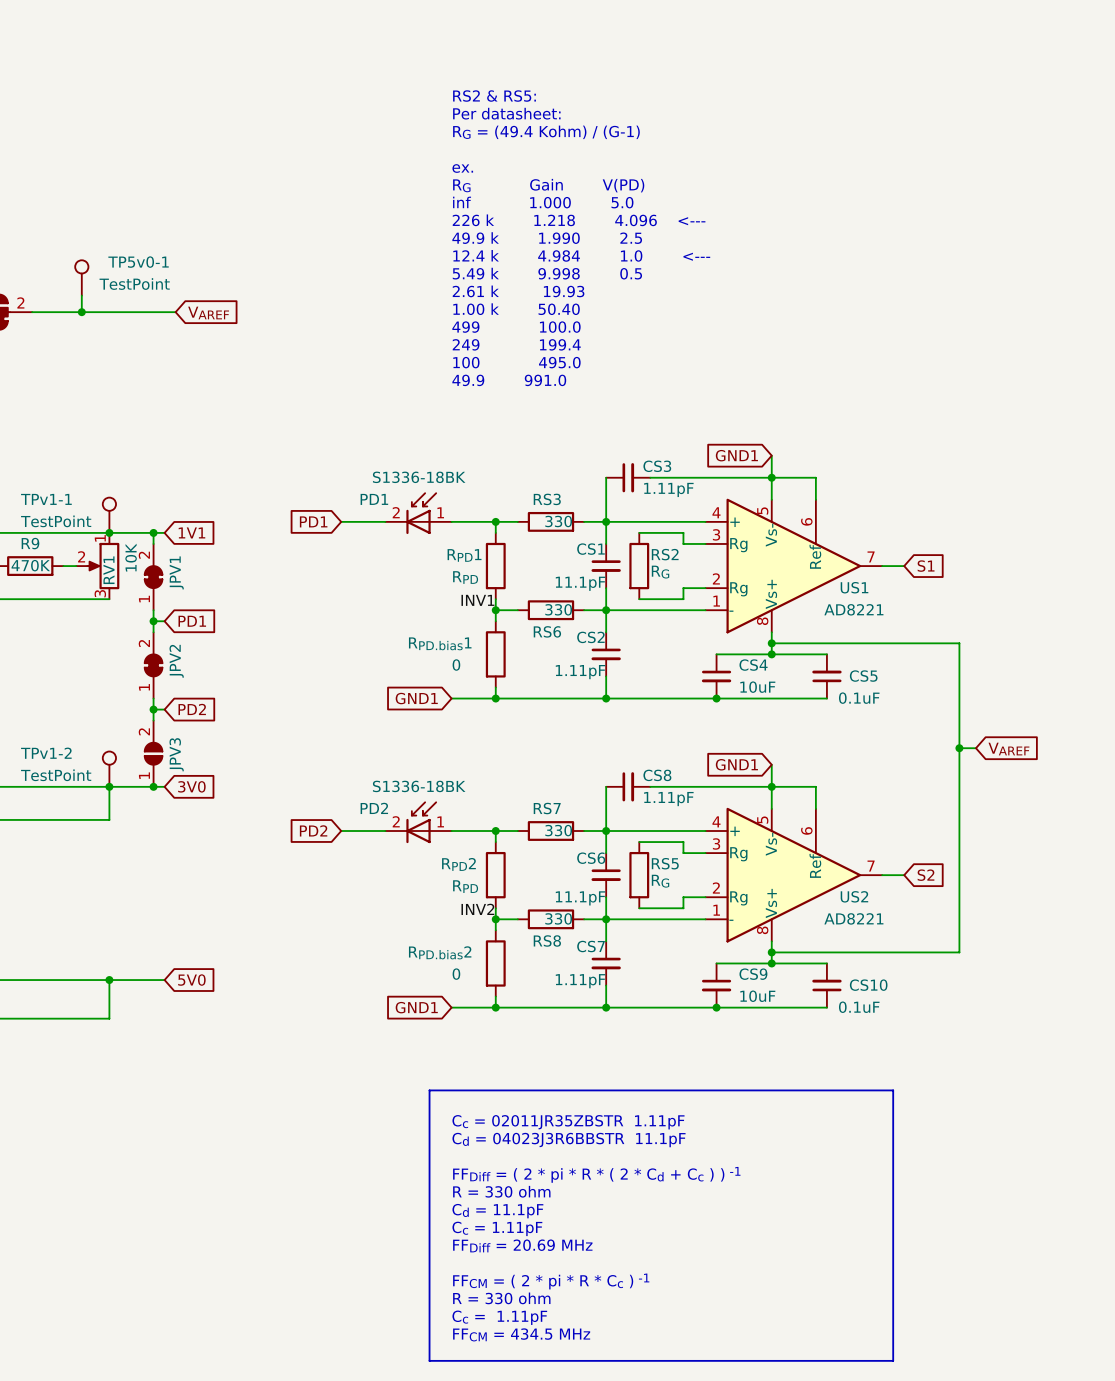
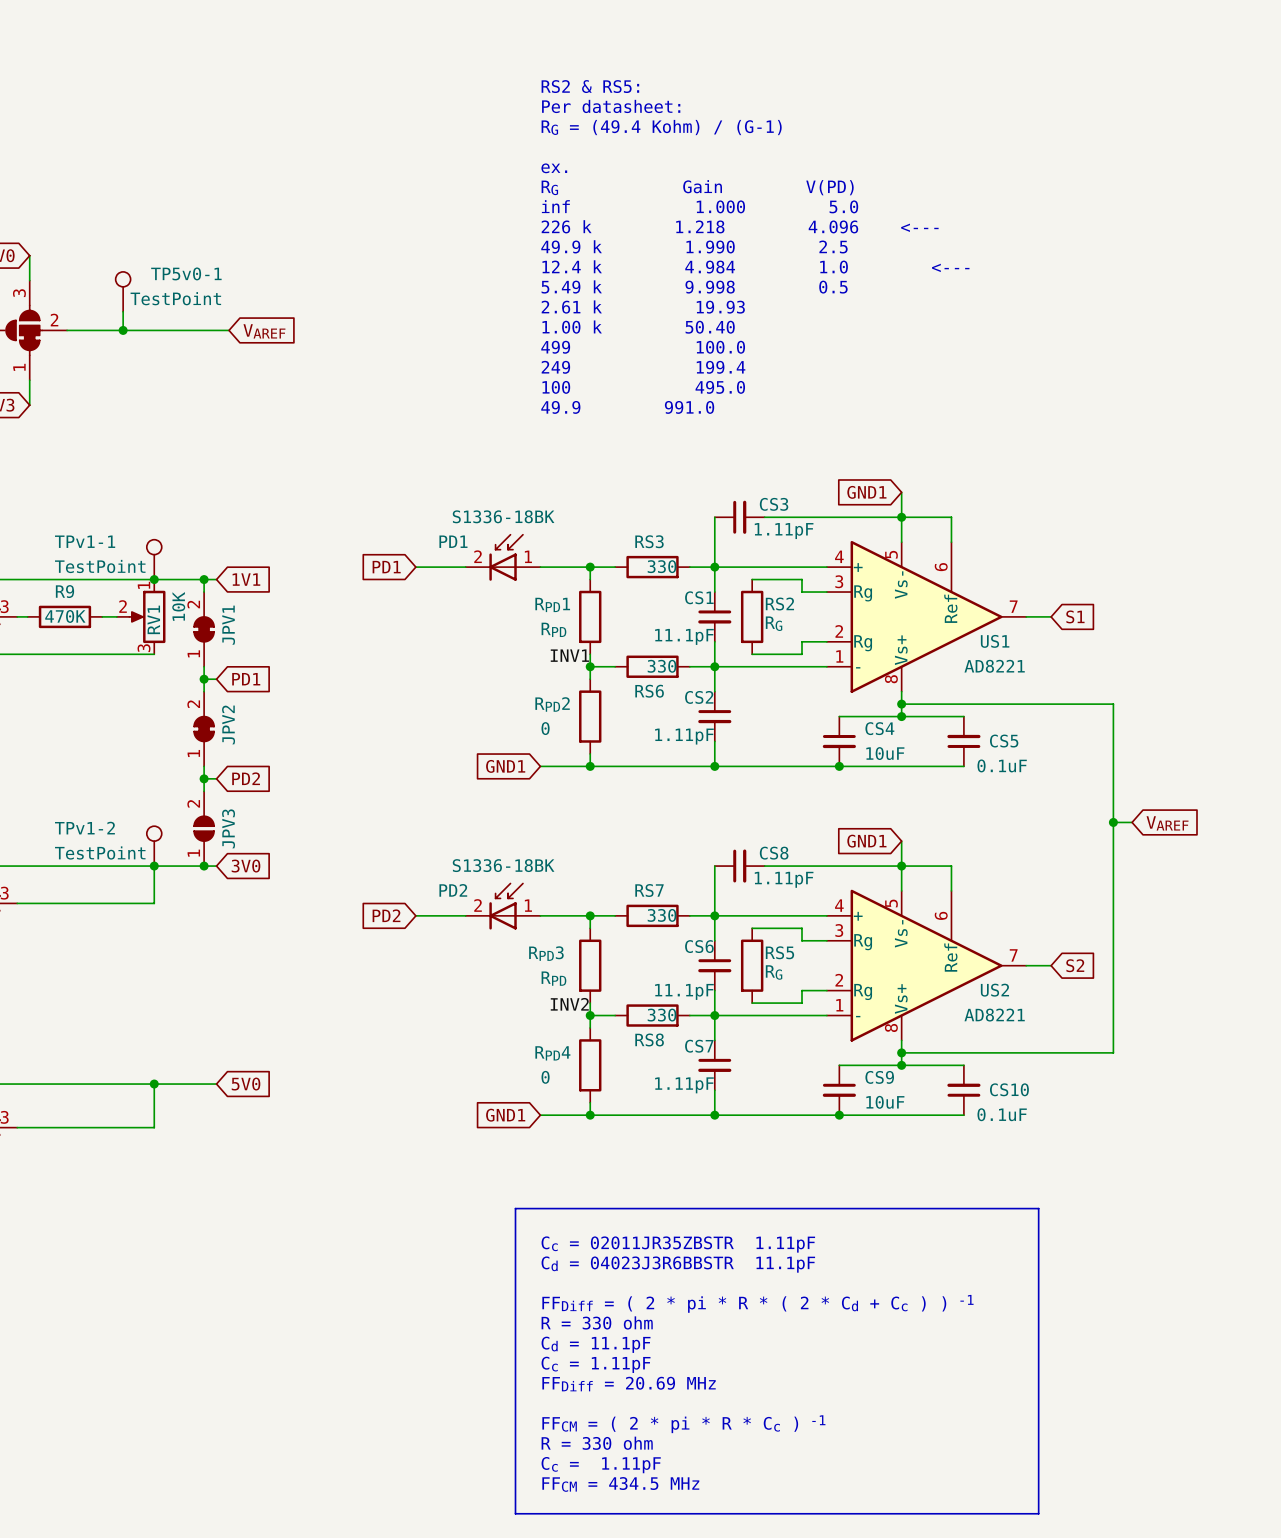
RPD.bias1 name: RPD.bias1 (440, 643) -> RPD2 (552, 704)
RPD2 name: RPD2 (458, 864) -> RPD3 (546, 953)
RPD.bias2 name: RPD.bias2 (440, 952) -> RPD4 (552, 1053)

